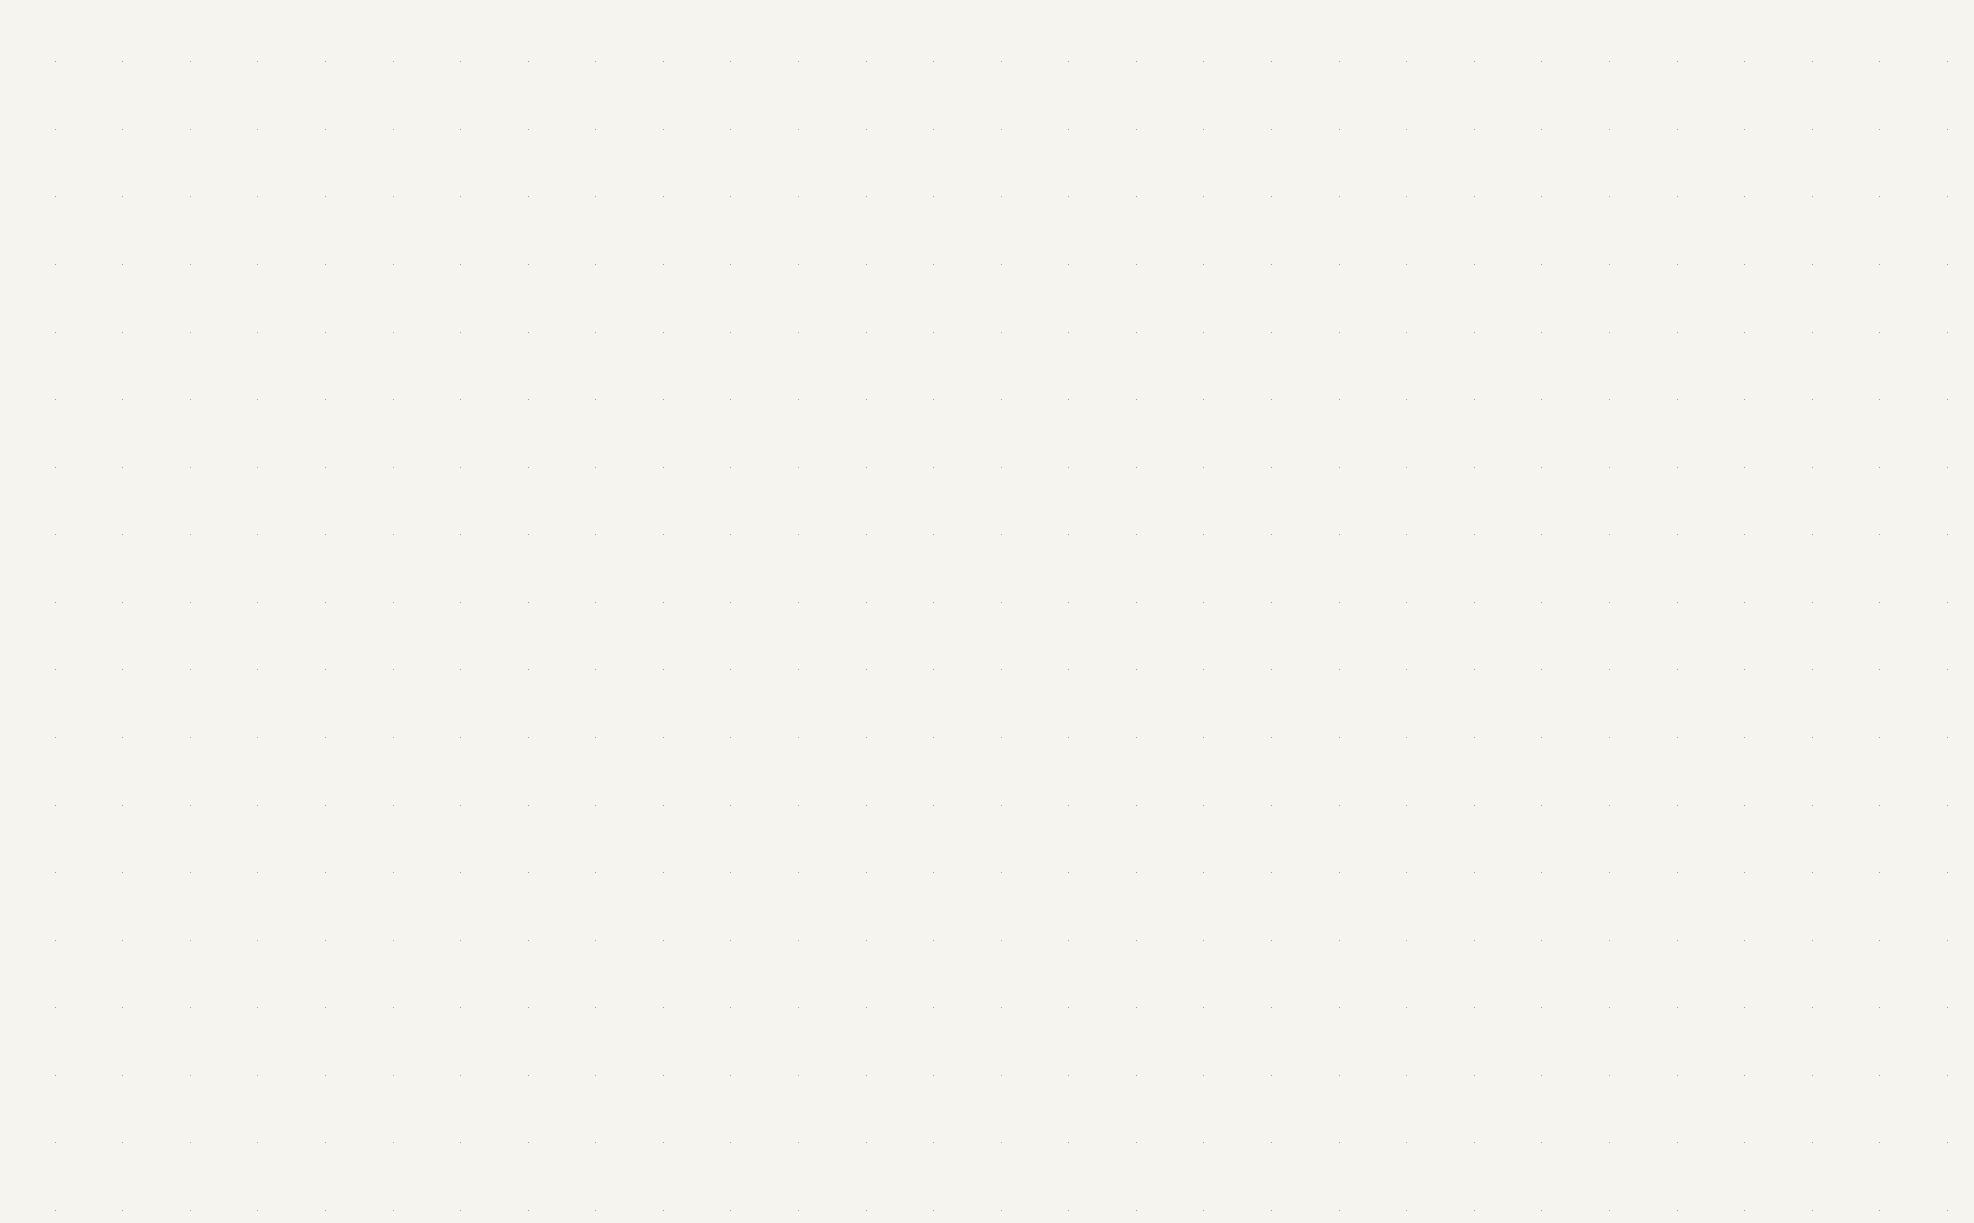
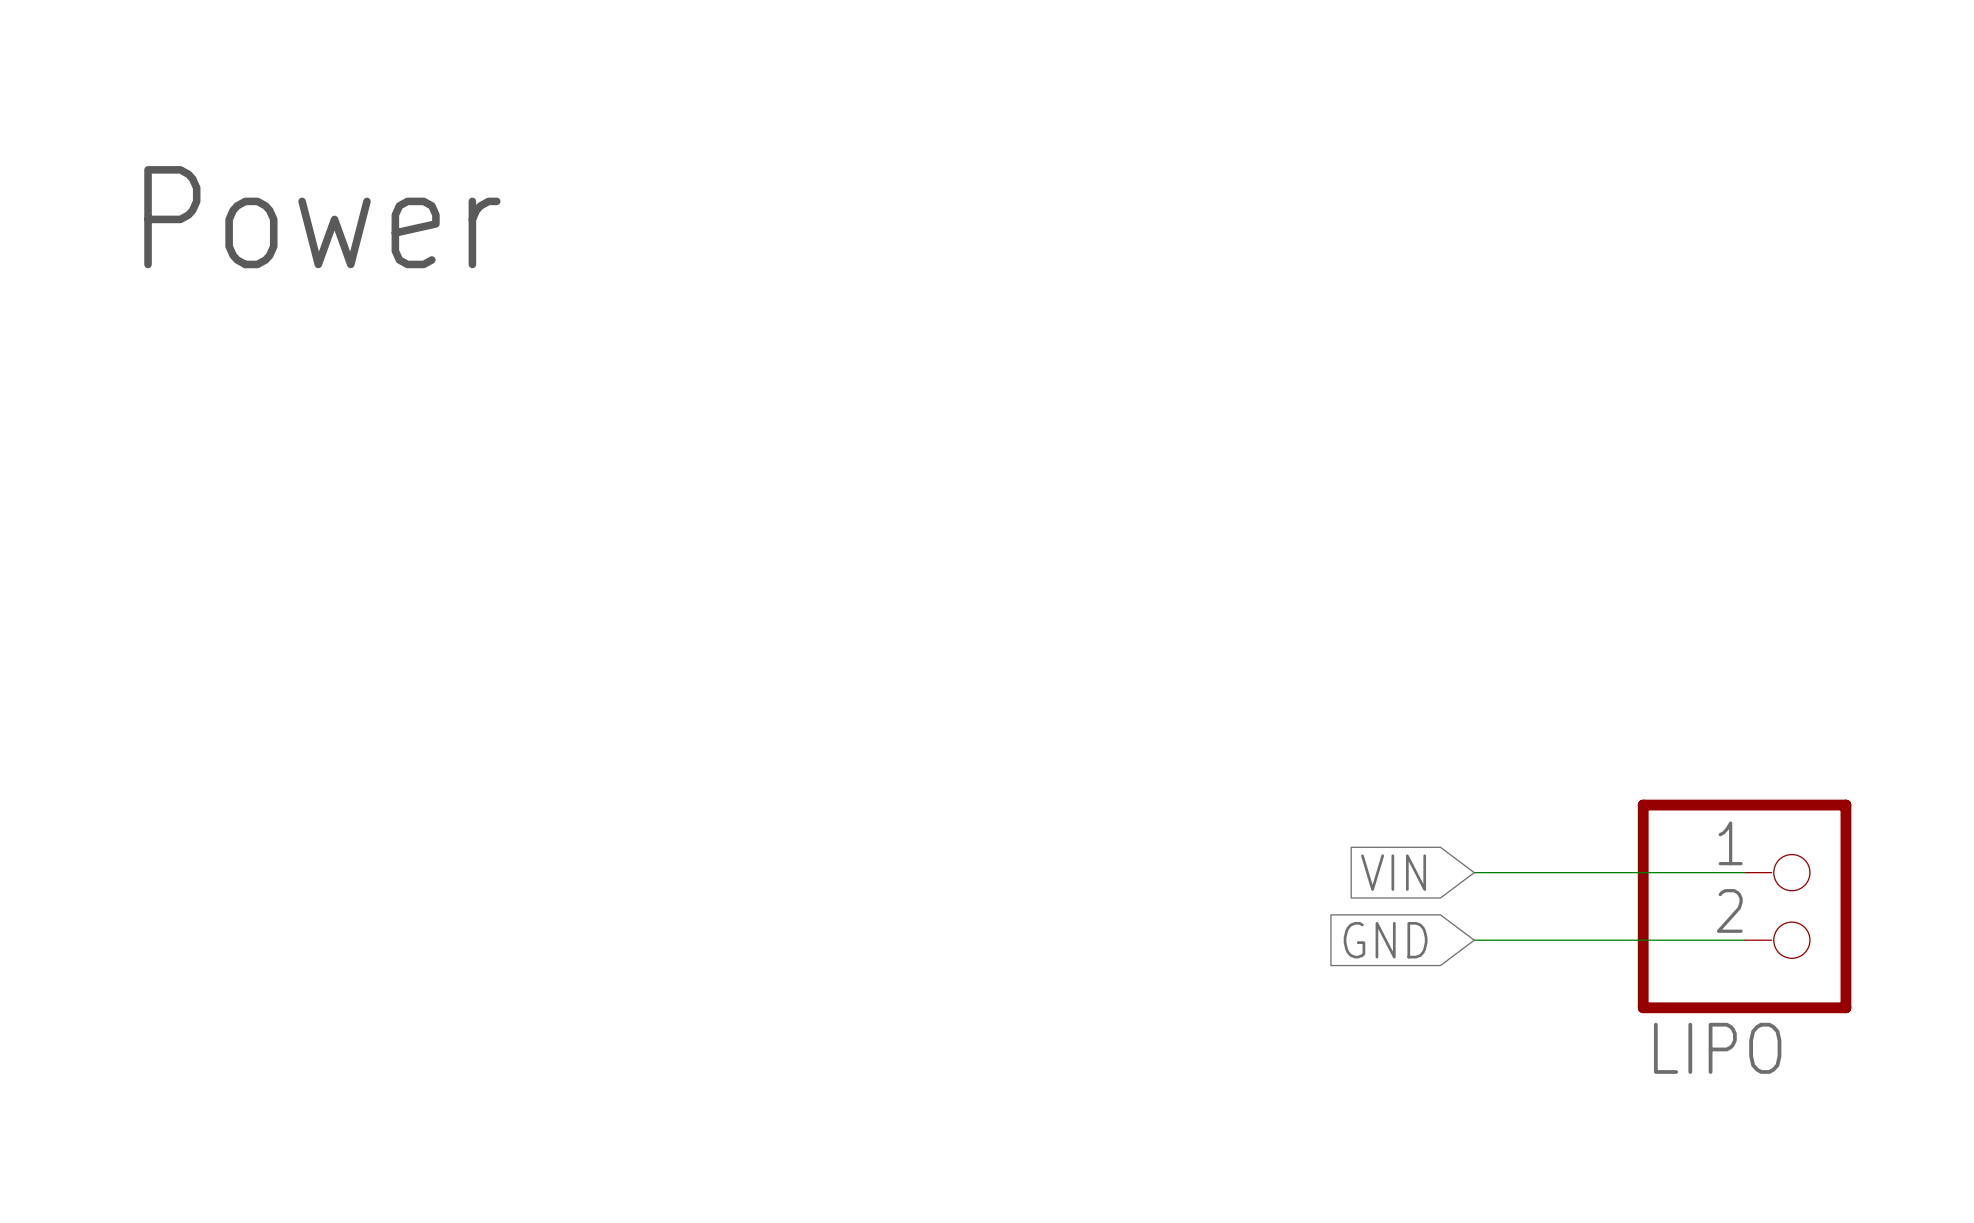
text: none -> Power (322, 217)
global label: none -> VIN (1393, 872)
wire: none -> (1474, 872) (1744, 872)
LIPO: none -> (1744, 906)
global label: none -> GND (1385, 940)
wire: none -> (1474, 940) (1744, 940)

